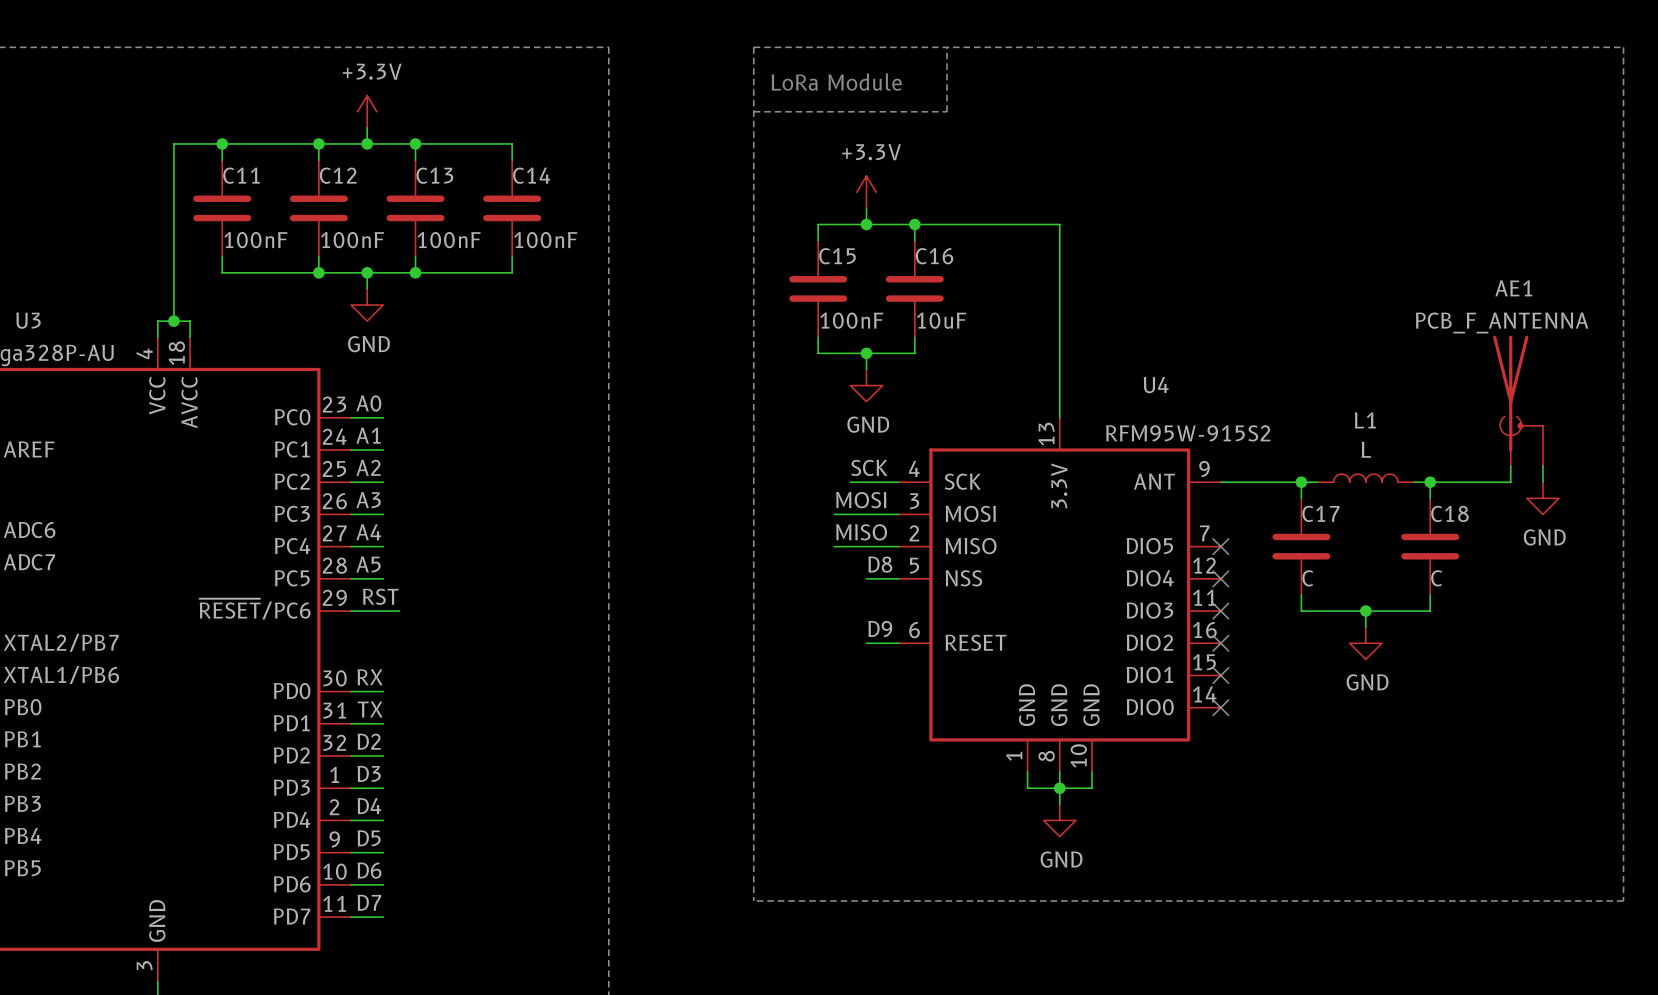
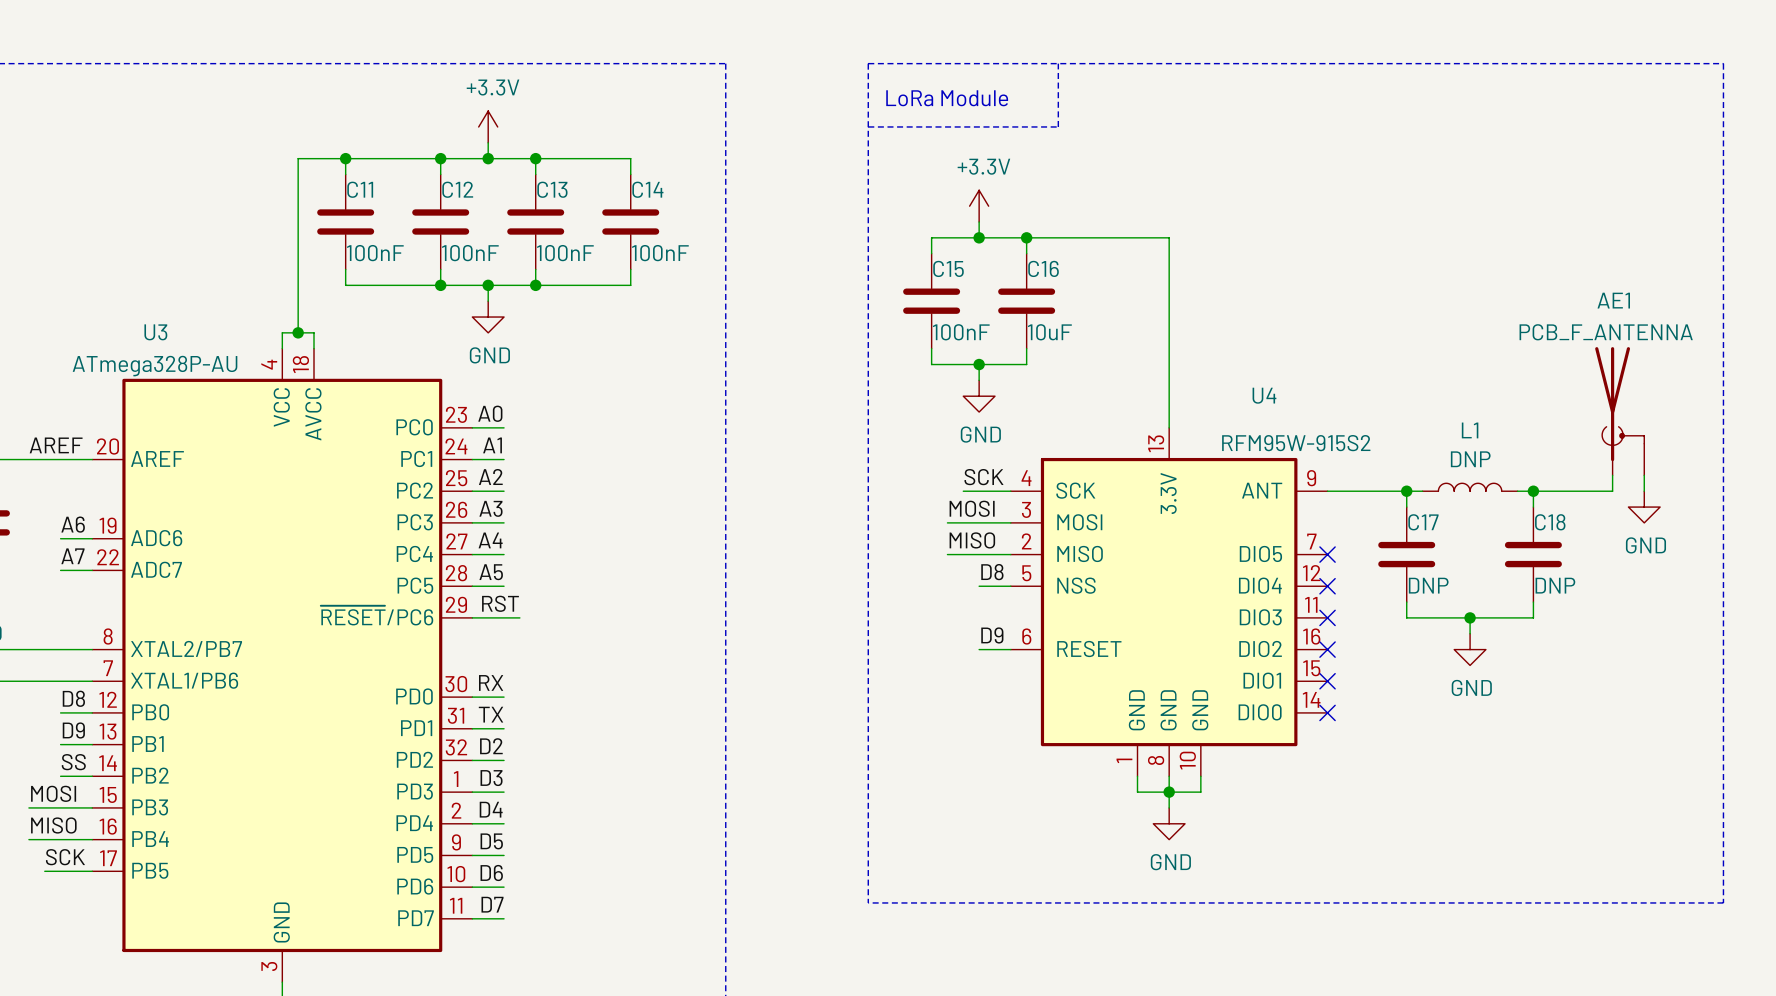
L1 value: L (1366, 449) -> DNP (1470, 459)
C17 value: C (1307, 578) -> DNP (1428, 585)
C18 value: C (1436, 578) -> DNP (1555, 585)

